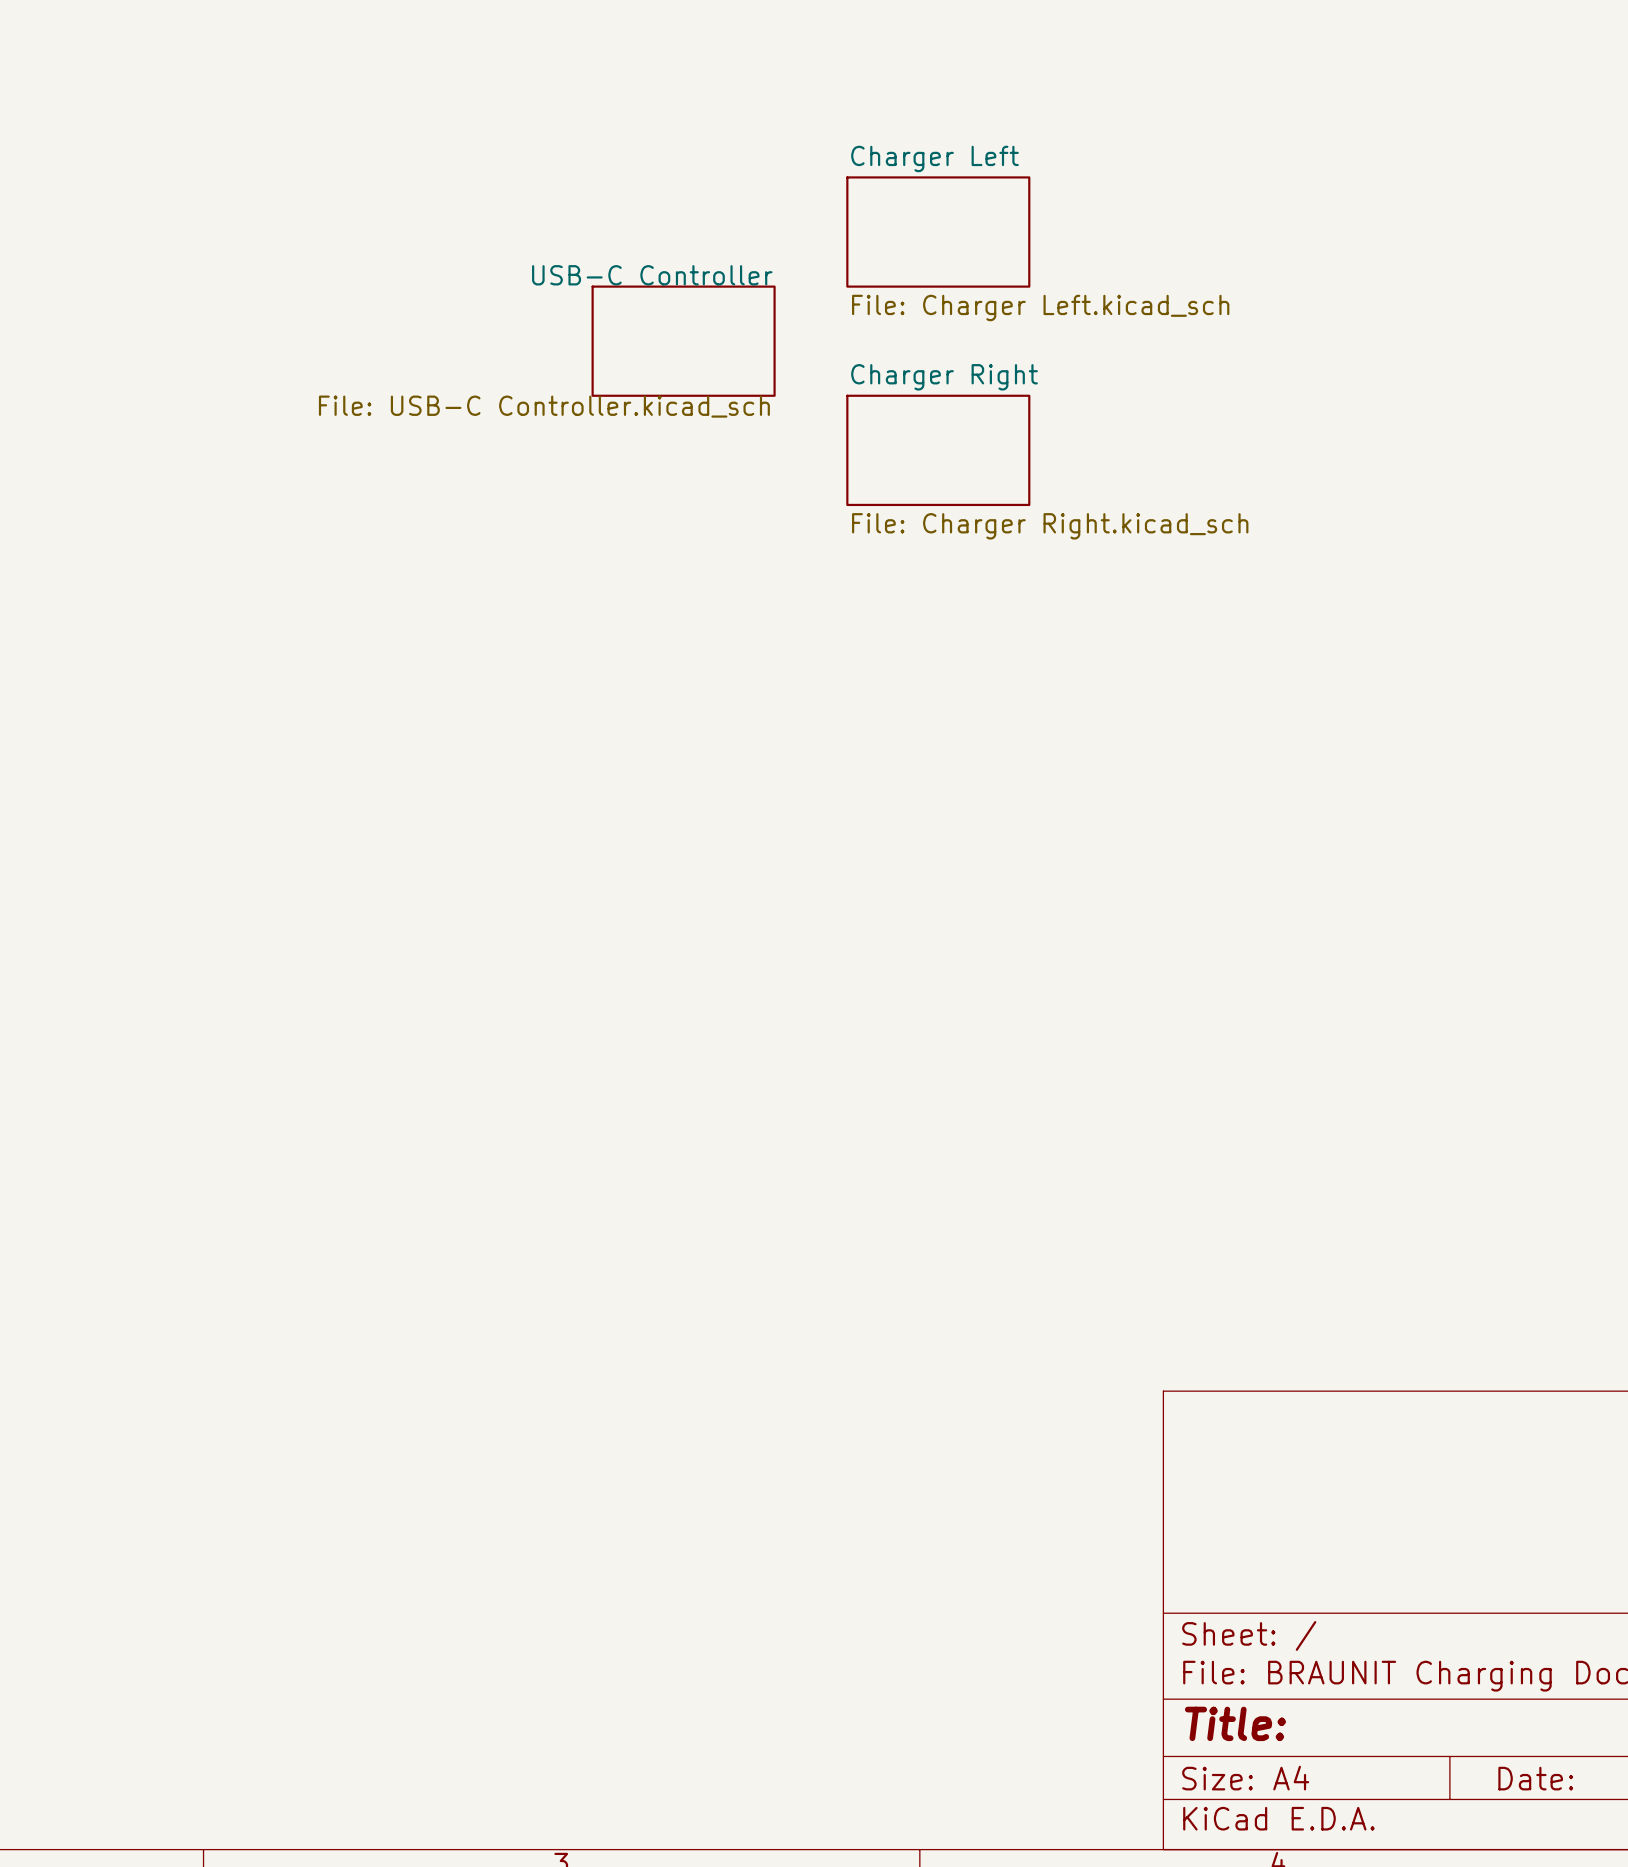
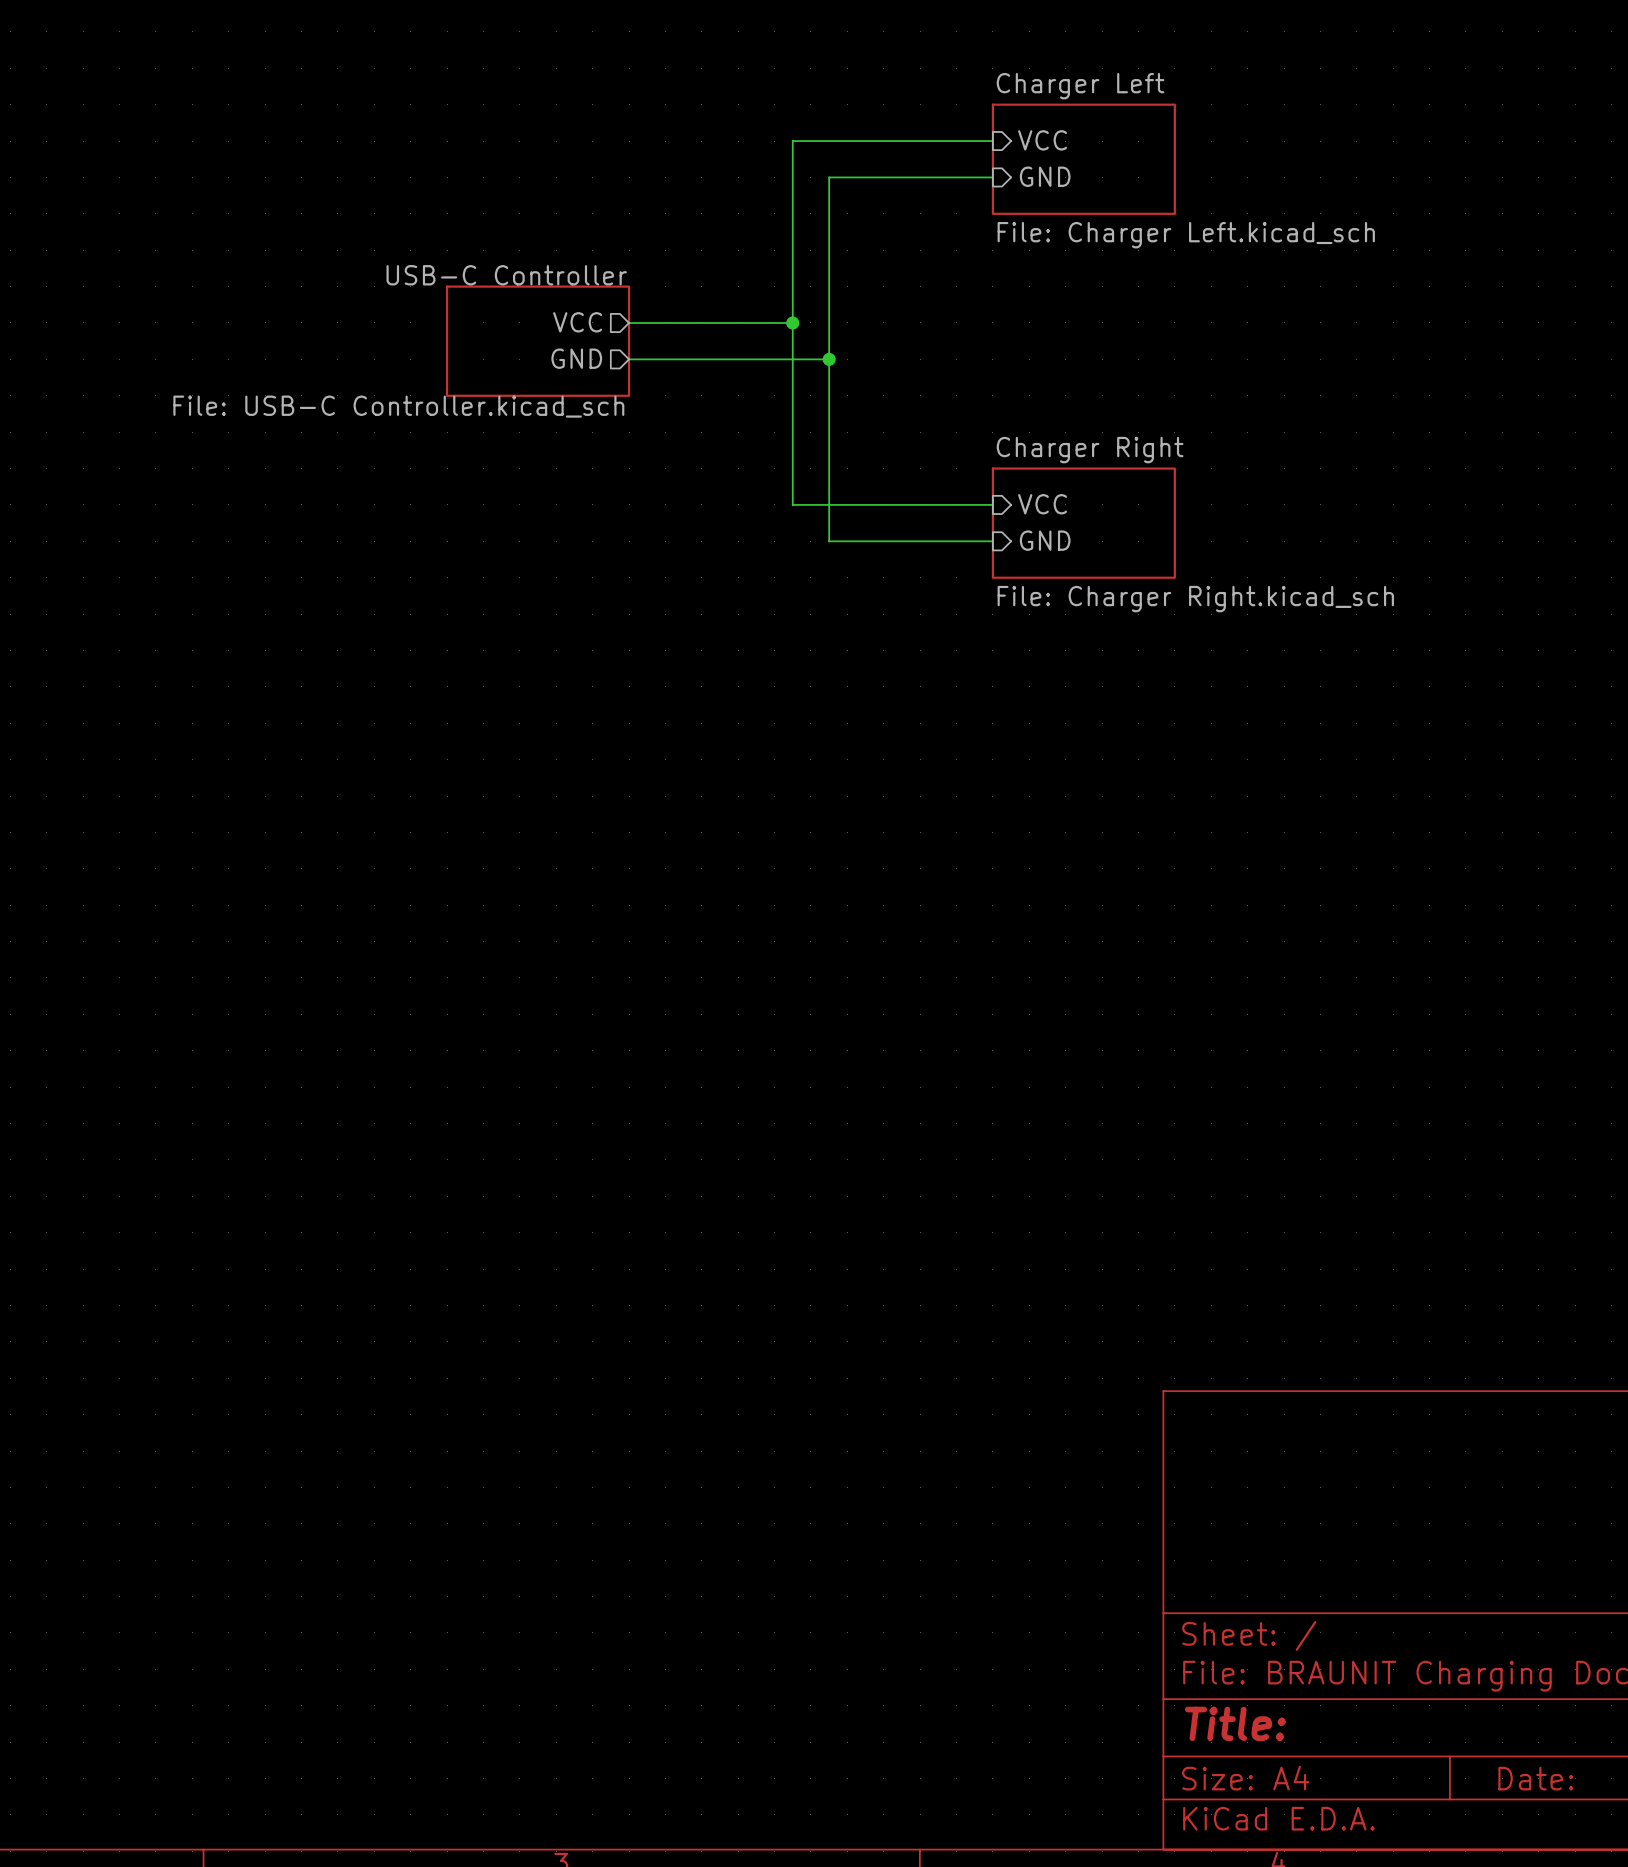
sheet pin: none -> VCC (1042, 140)
wire: none -> (992, 141) (792, 141) (792, 504) (992, 504)
sheet pin: none -> GND (1045, 176)
wire: none -> (992, 177) (829, 177) (829, 541) (992, 541)
sheet Charger Left position: (938, 232) -> (1083, 159)
sheet pin: none -> VCC (577, 322)
wire: none -> (629, 322) (792, 322)
junction: none -> (792, 322)
sheet USB-C Controller position: (683, 341) -> (538, 341)
sheet pin: none -> GND (576, 358)
wire: none -> (629, 359) (829, 359)
junction: none -> (829, 359)
sheet Charger Right position: (938, 450) -> (1083, 523)
sheet pin: none -> VCC (1042, 504)
sheet pin: none -> GND (1045, 540)

